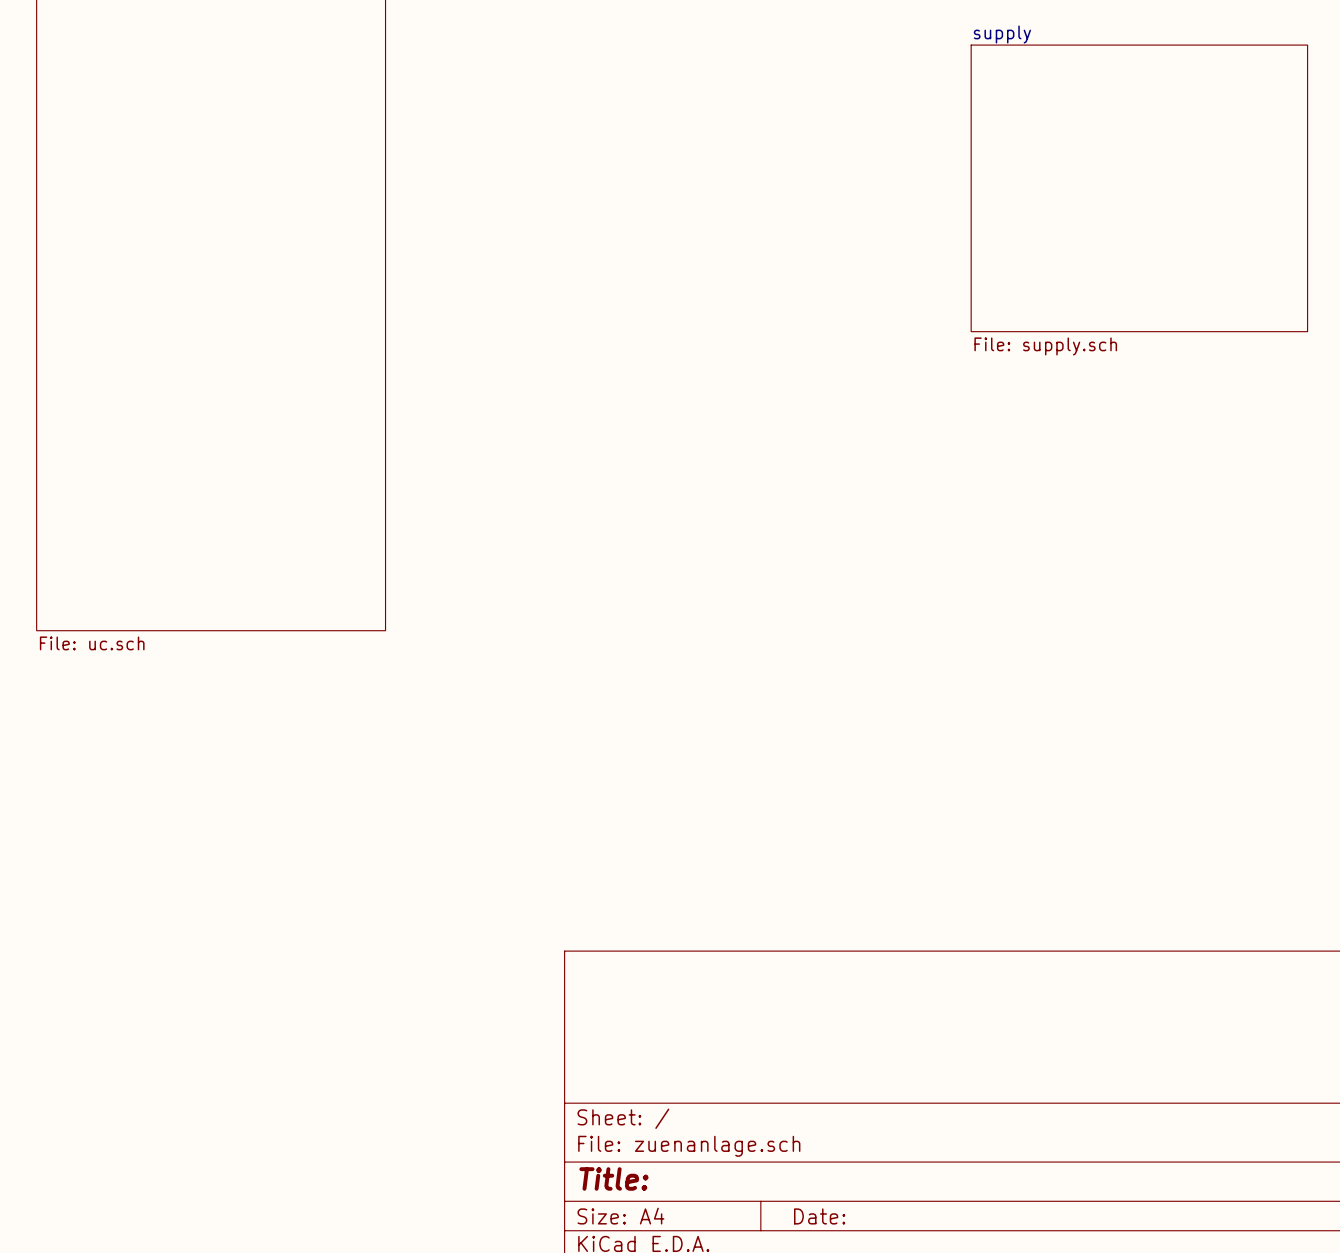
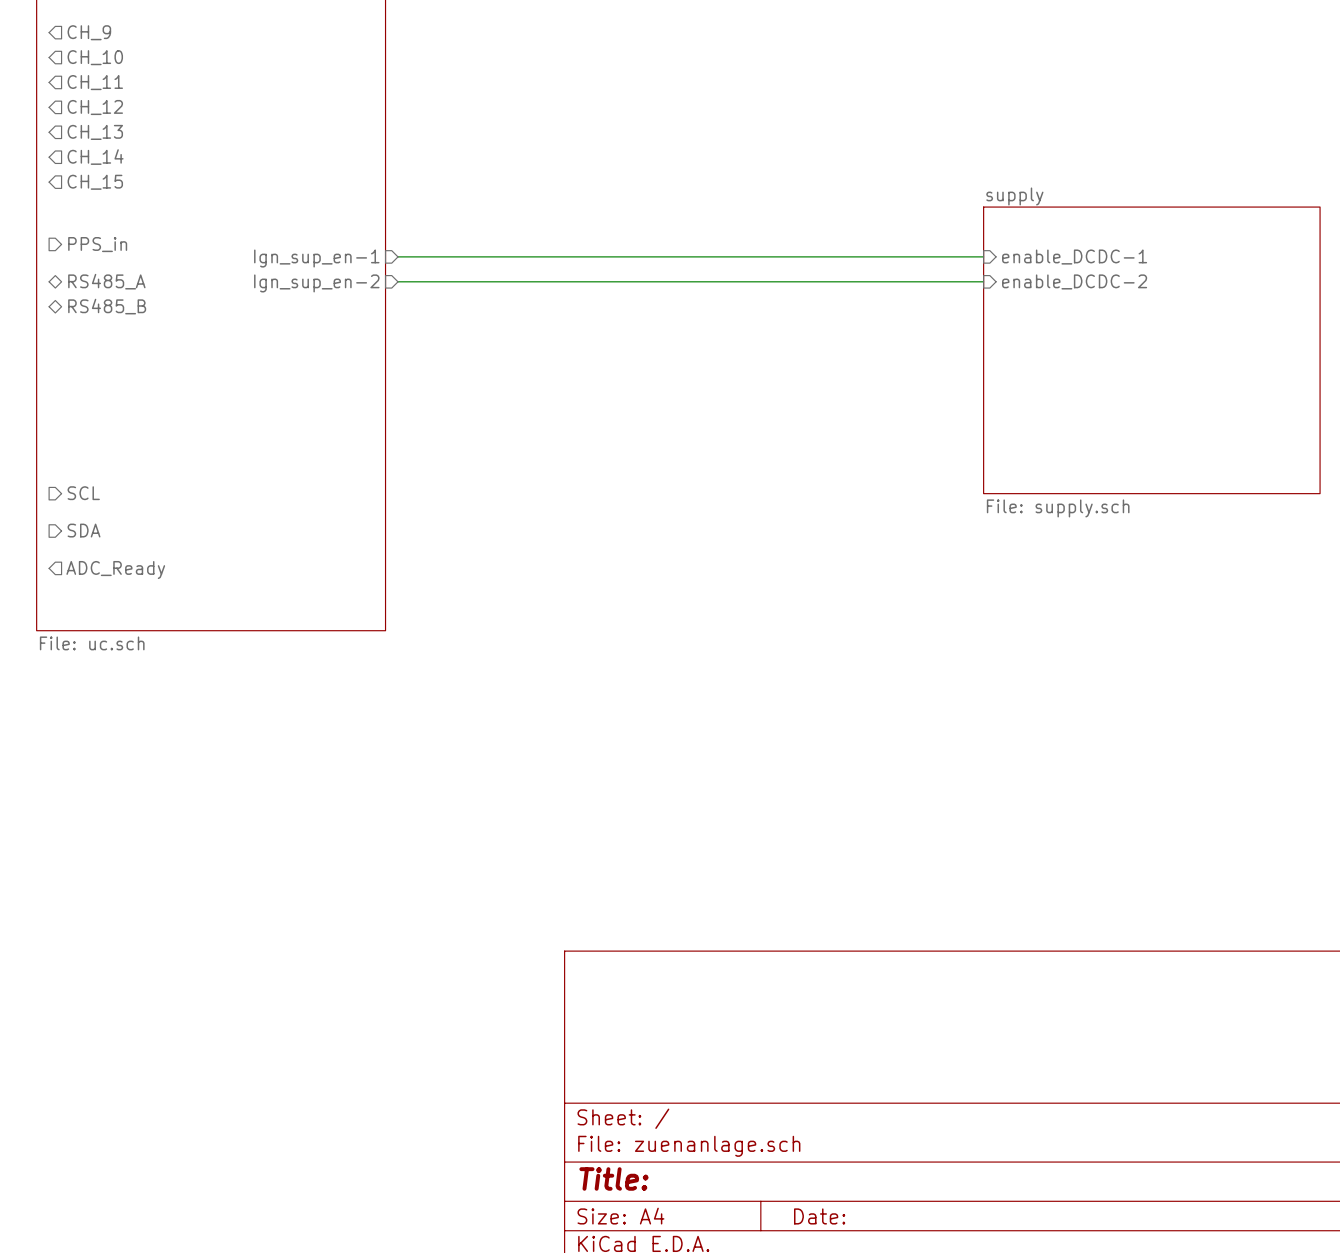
sheet pin: none -> CH_9 (89, 32)
sheet pin: none -> CH_10 (95, 57)
sheet pin: none -> CH_11 (95, 82)
sheet pin: none -> CH_12 (95, 107)
sheet pin: none -> CH_13 (95, 132)
sheet pin: none -> CH_14 (95, 157)
sheet pin: none -> CH_15 (95, 182)
sheet supply position: (1139, 188) -> (1151, 350)
sheet pin: none -> PPS_in (97, 244)
wire: none -> (397, 256) (983, 256)
sheet pin: none -> enable_DCDC-1 (1074, 257)
sheet pin: none -> Ign_sup_en-1 (316, 258)
sheet pin: none -> RS485_A (106, 281)
wire: none -> (397, 281) (983, 281)
sheet pin: none -> enable_DCDC-2 (1074, 281)
sheet pin: none -> Ign_sup_en-2 (316, 283)
sheet pin: none -> RS485_B (107, 306)
sheet pin: none -> SCL (83, 493)
sheet pin: none -> SDA (84, 530)
sheet pin: none -> ADC_Ready (115, 570)

